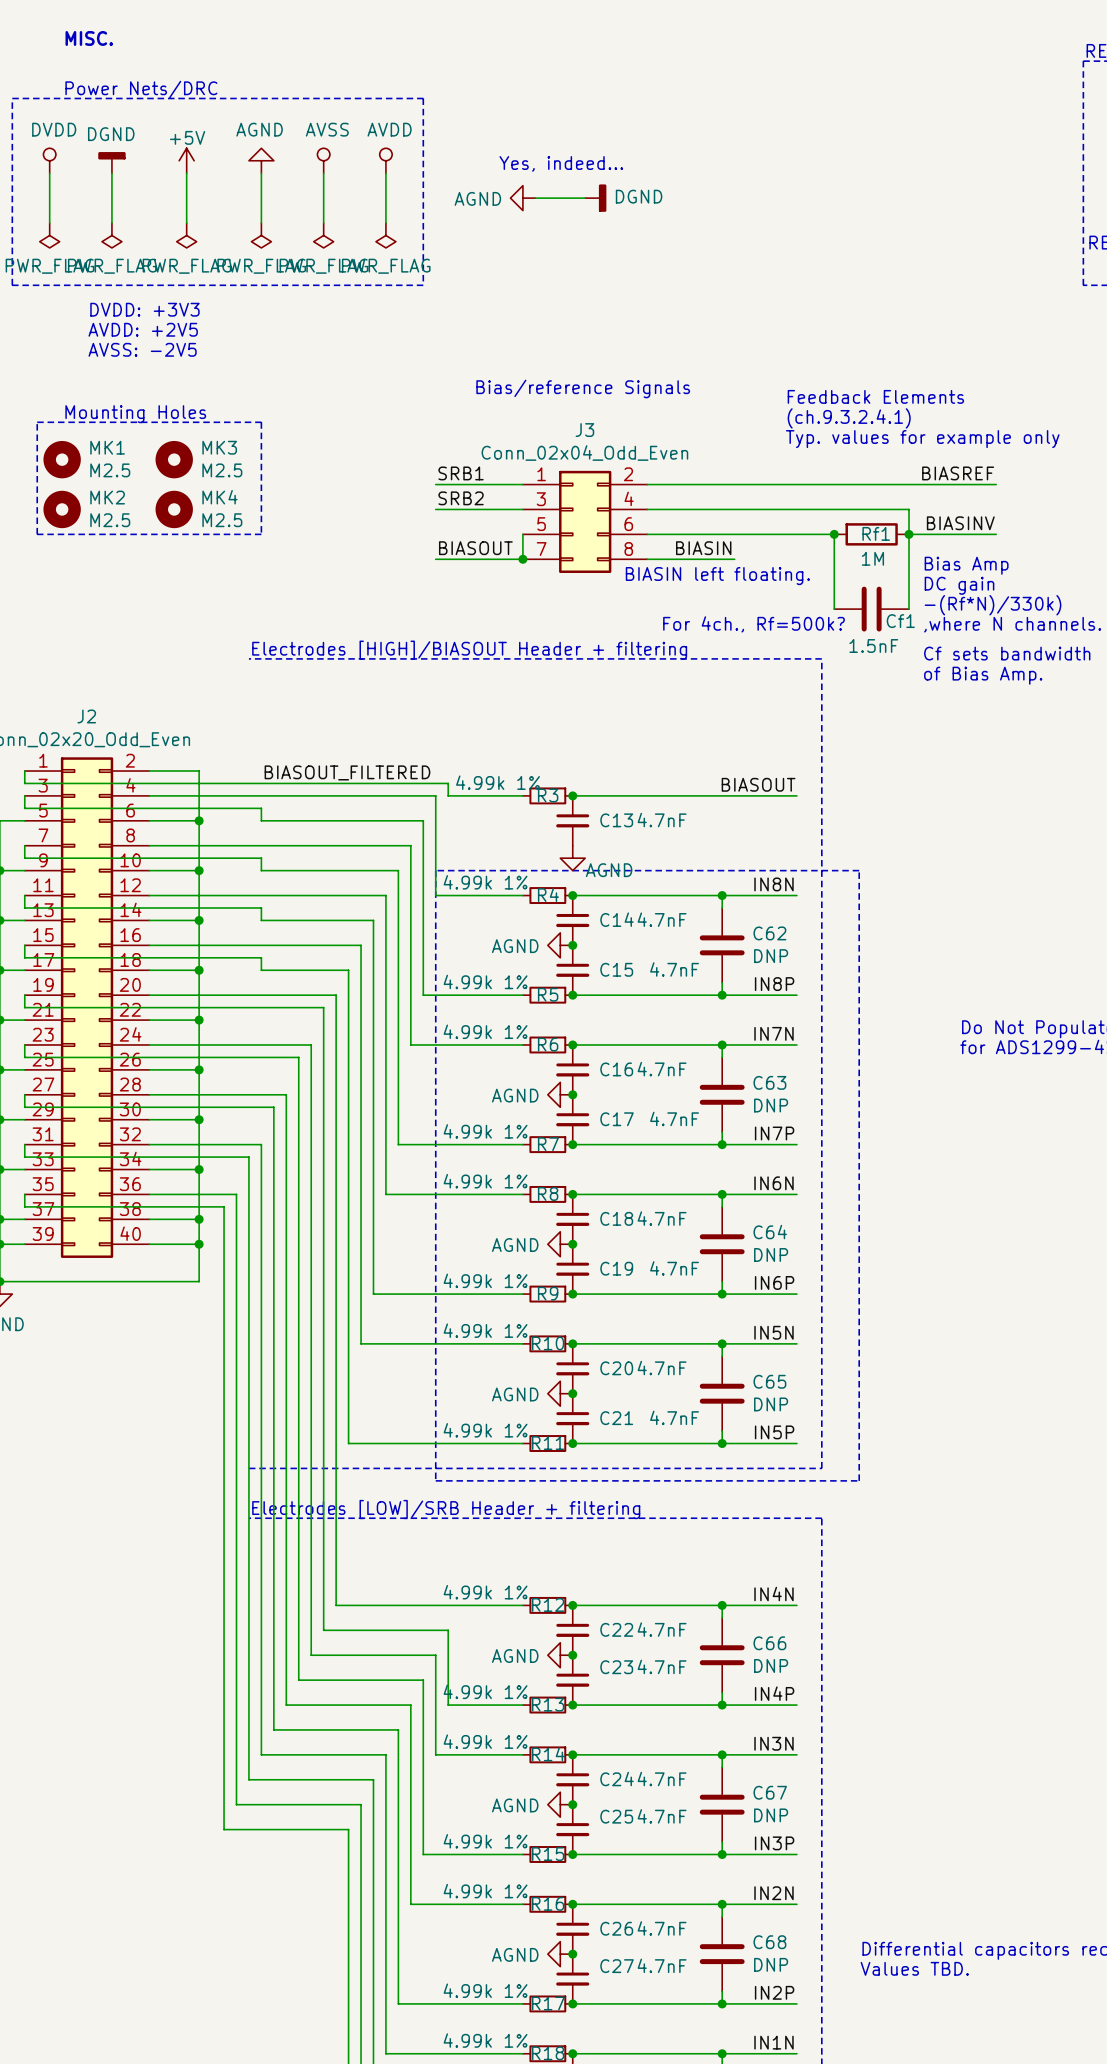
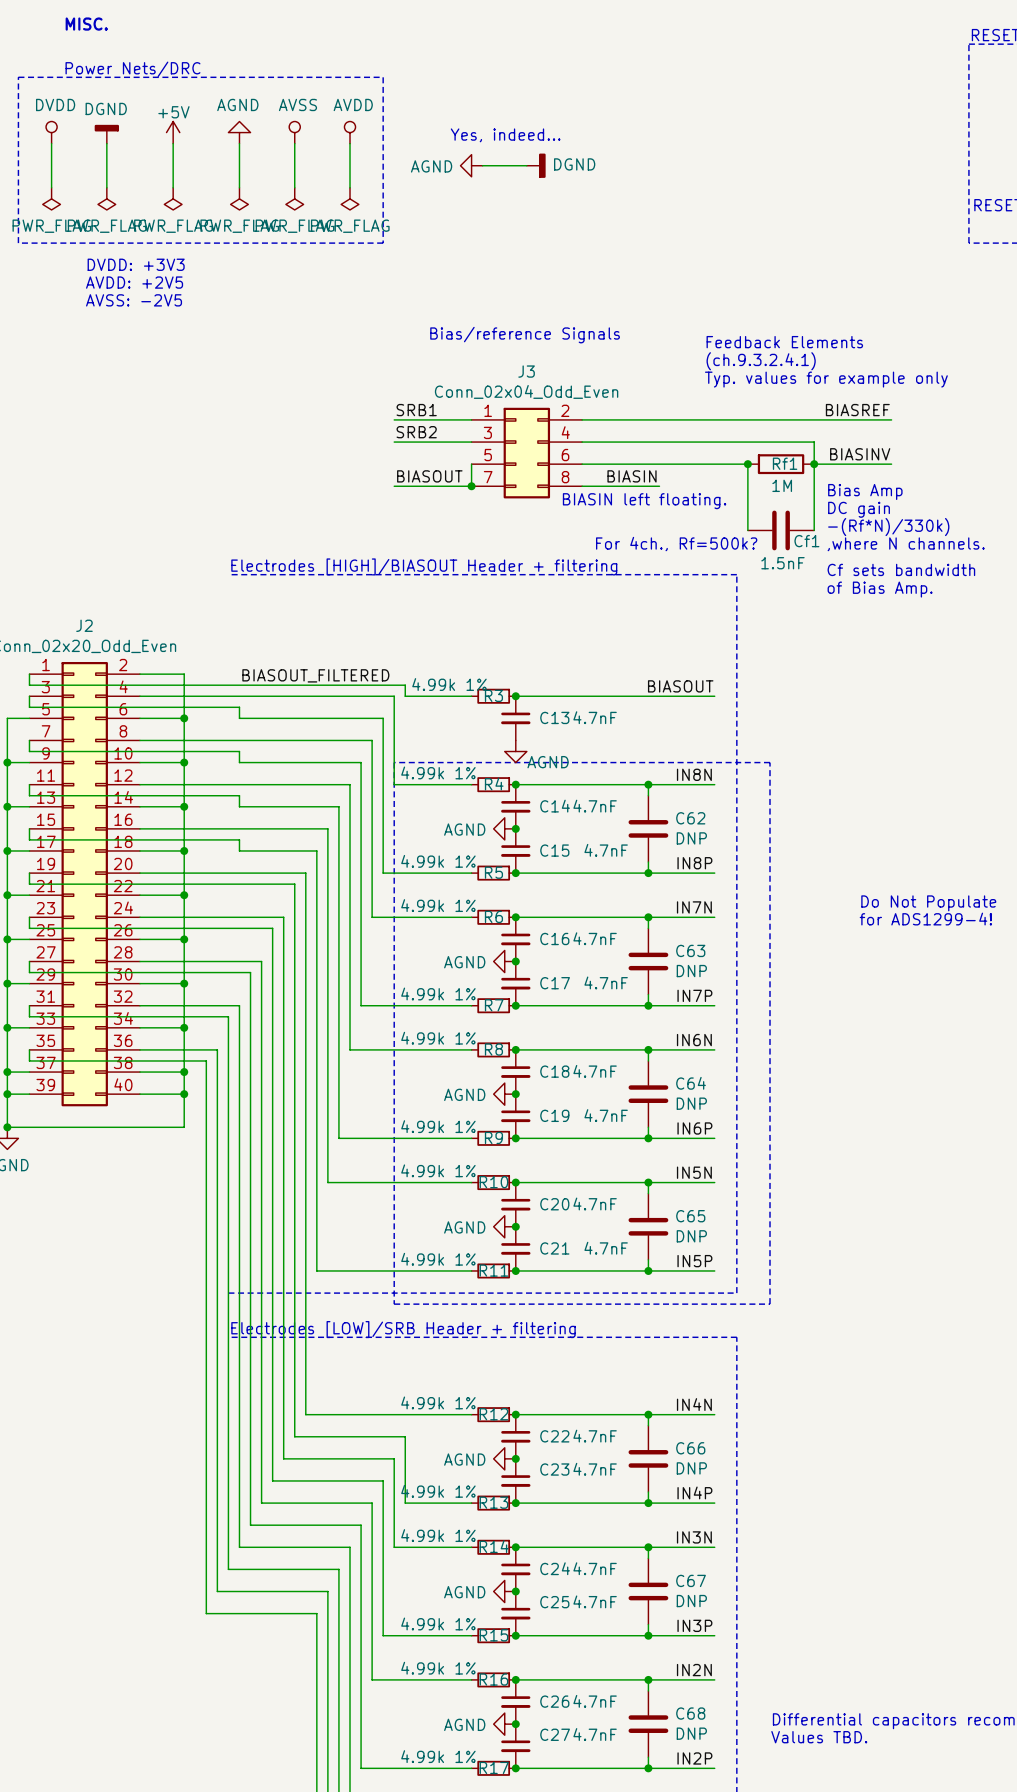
text: Mounting Holes (135, 414) -> none
line: (37, 422) (261, 422) (261, 534) (37, 534) (37, 422) -> none
MK1: M2.5 (62, 459) -> none
MK3: M2.5 (174, 459) -> none
MK2: M2.5 (62, 509) -> none
MK4: M2.5 (174, 509) -> none

